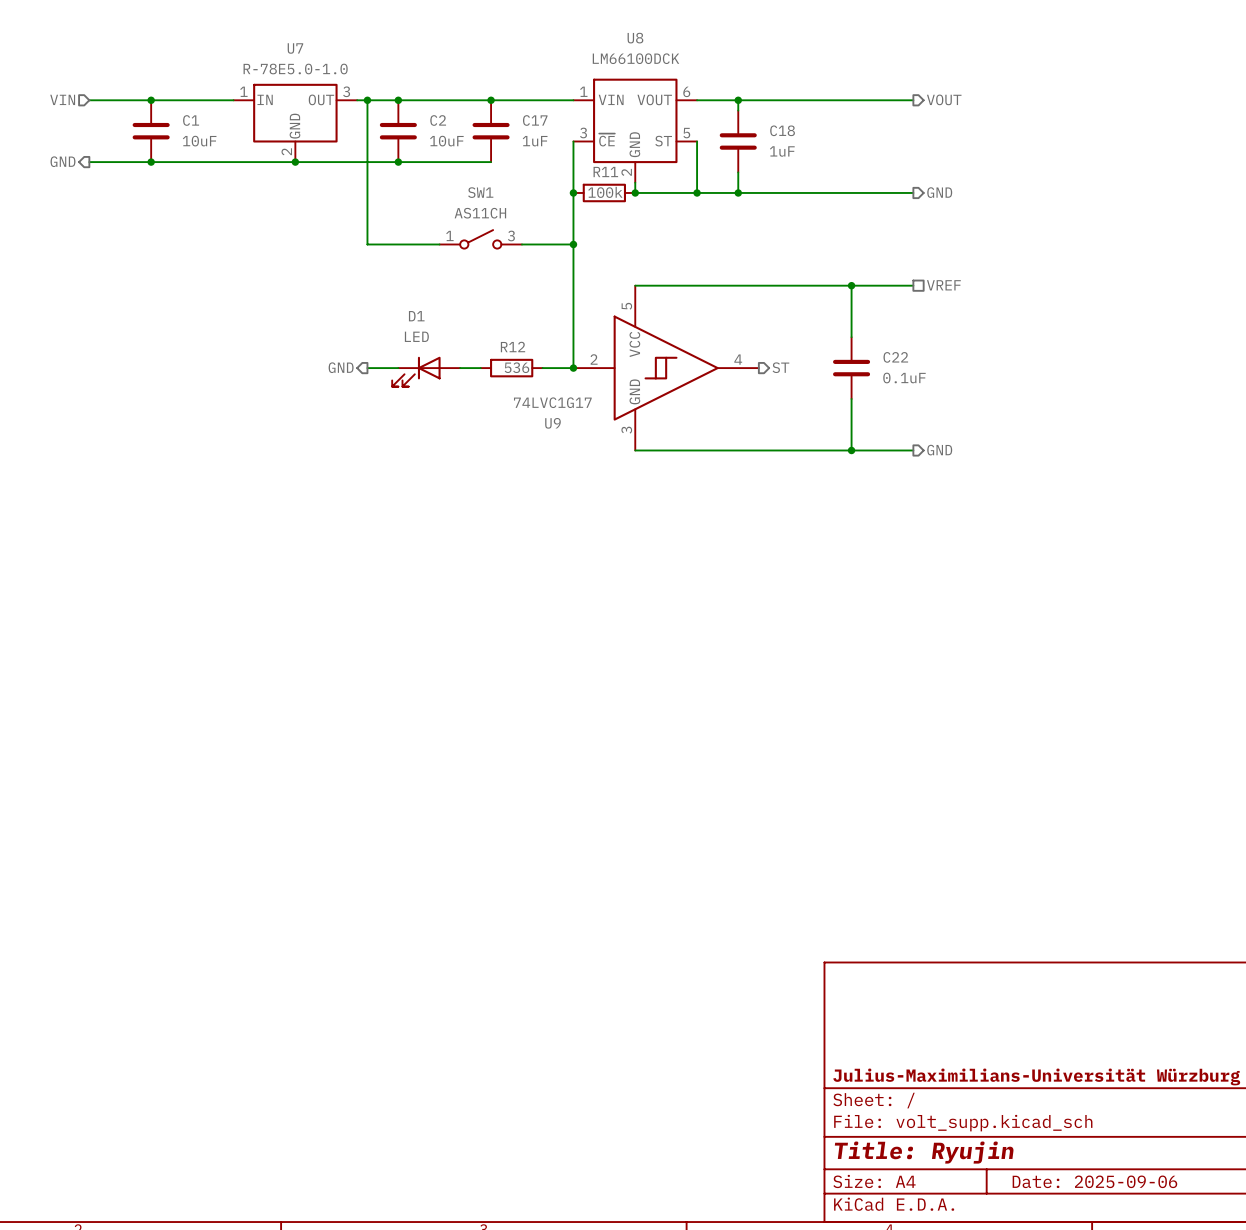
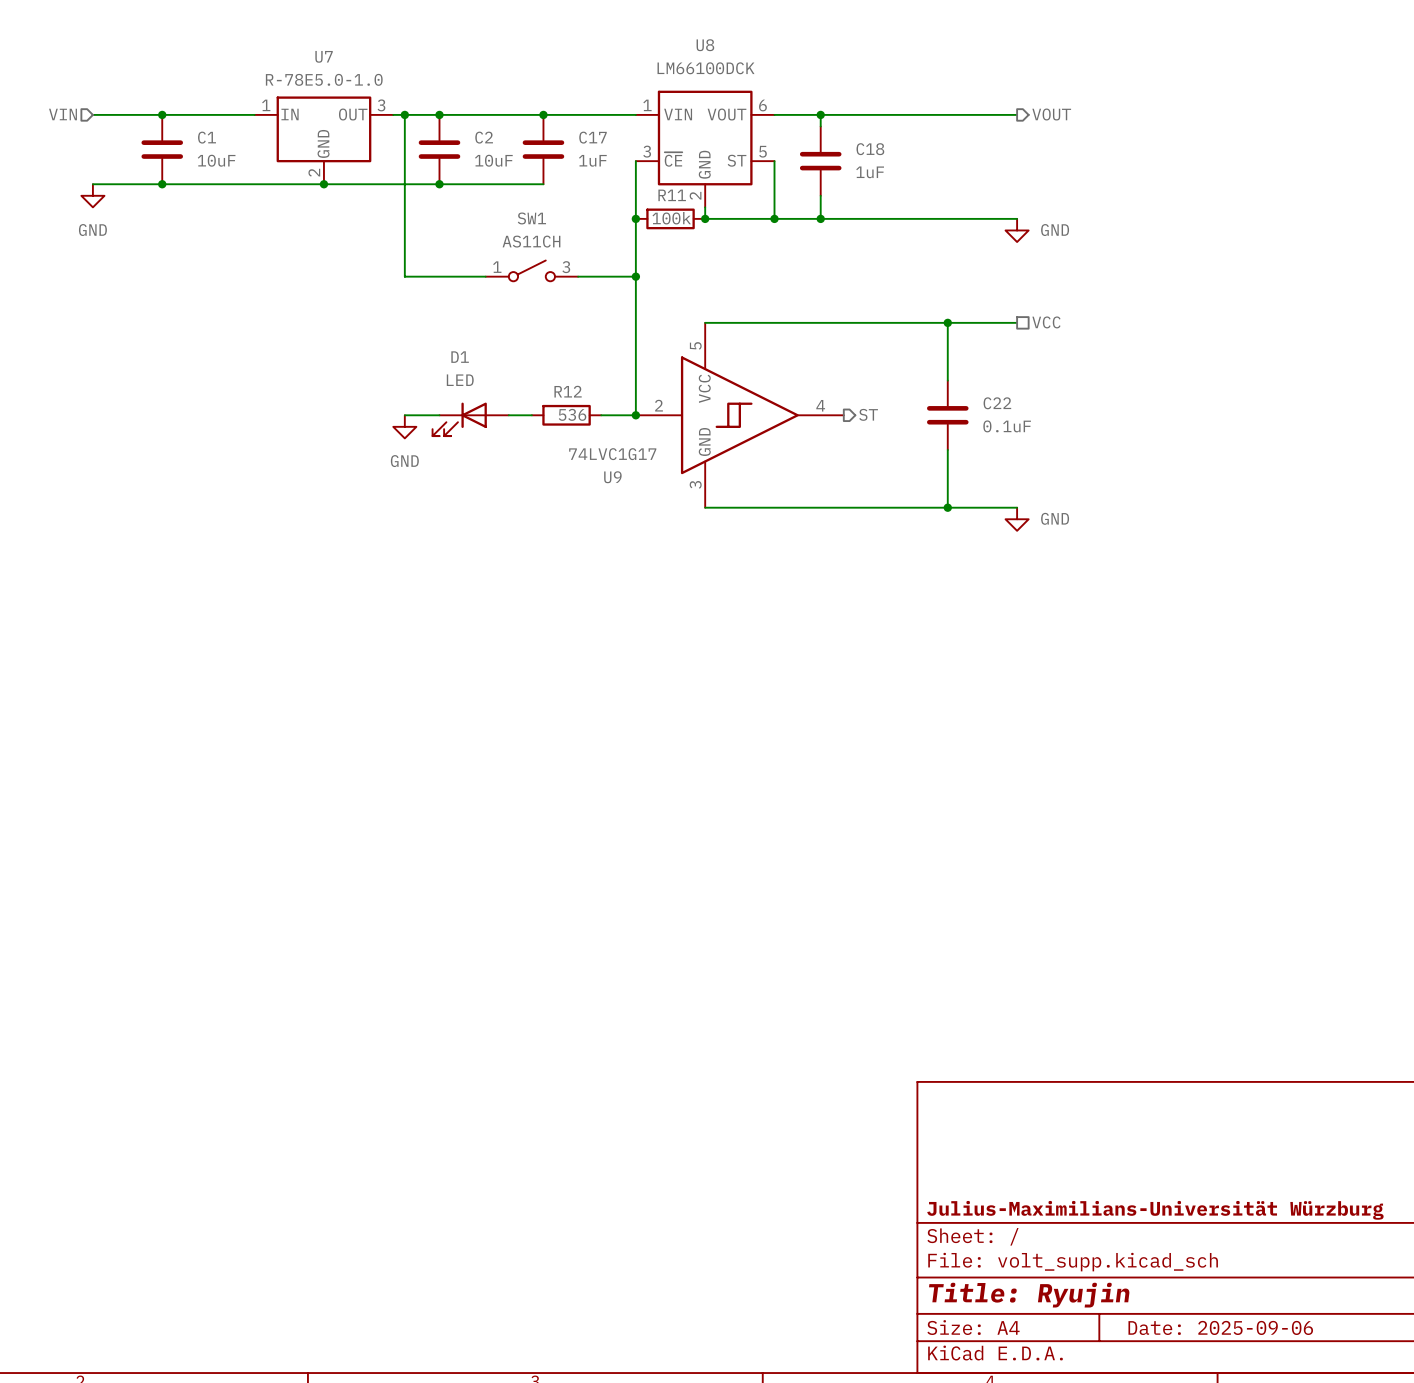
hierarchical label: GND (63, 161) -> none
power symbol: none -> GND (92, 195)
hierarchical label: GND (939, 192) -> none
power symbol: none -> GND (1017, 230)
hierarchical label: VREF (943, 285) -> VCC (1046, 322)
hierarchical label: GND (341, 367) -> none
power symbol: none -> GND (404, 426)
hierarchical label: GND (939, 450) -> none
power symbol: none -> GND (1017, 519)

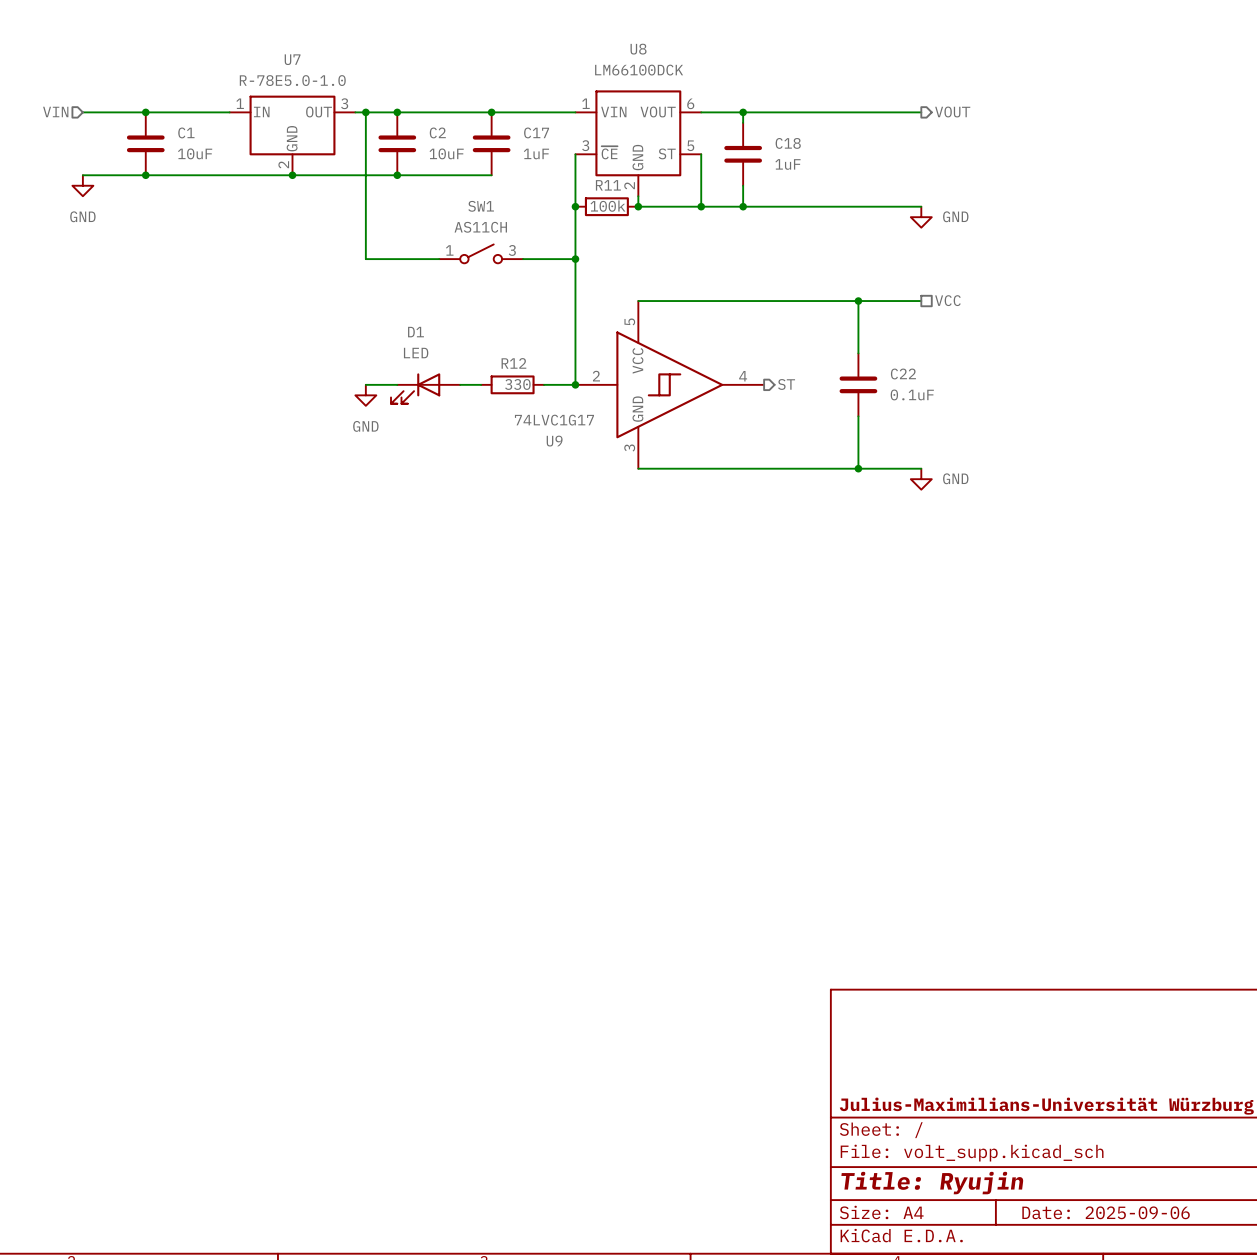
R12 value: 536 (572, 414) -> 330 (517, 384)

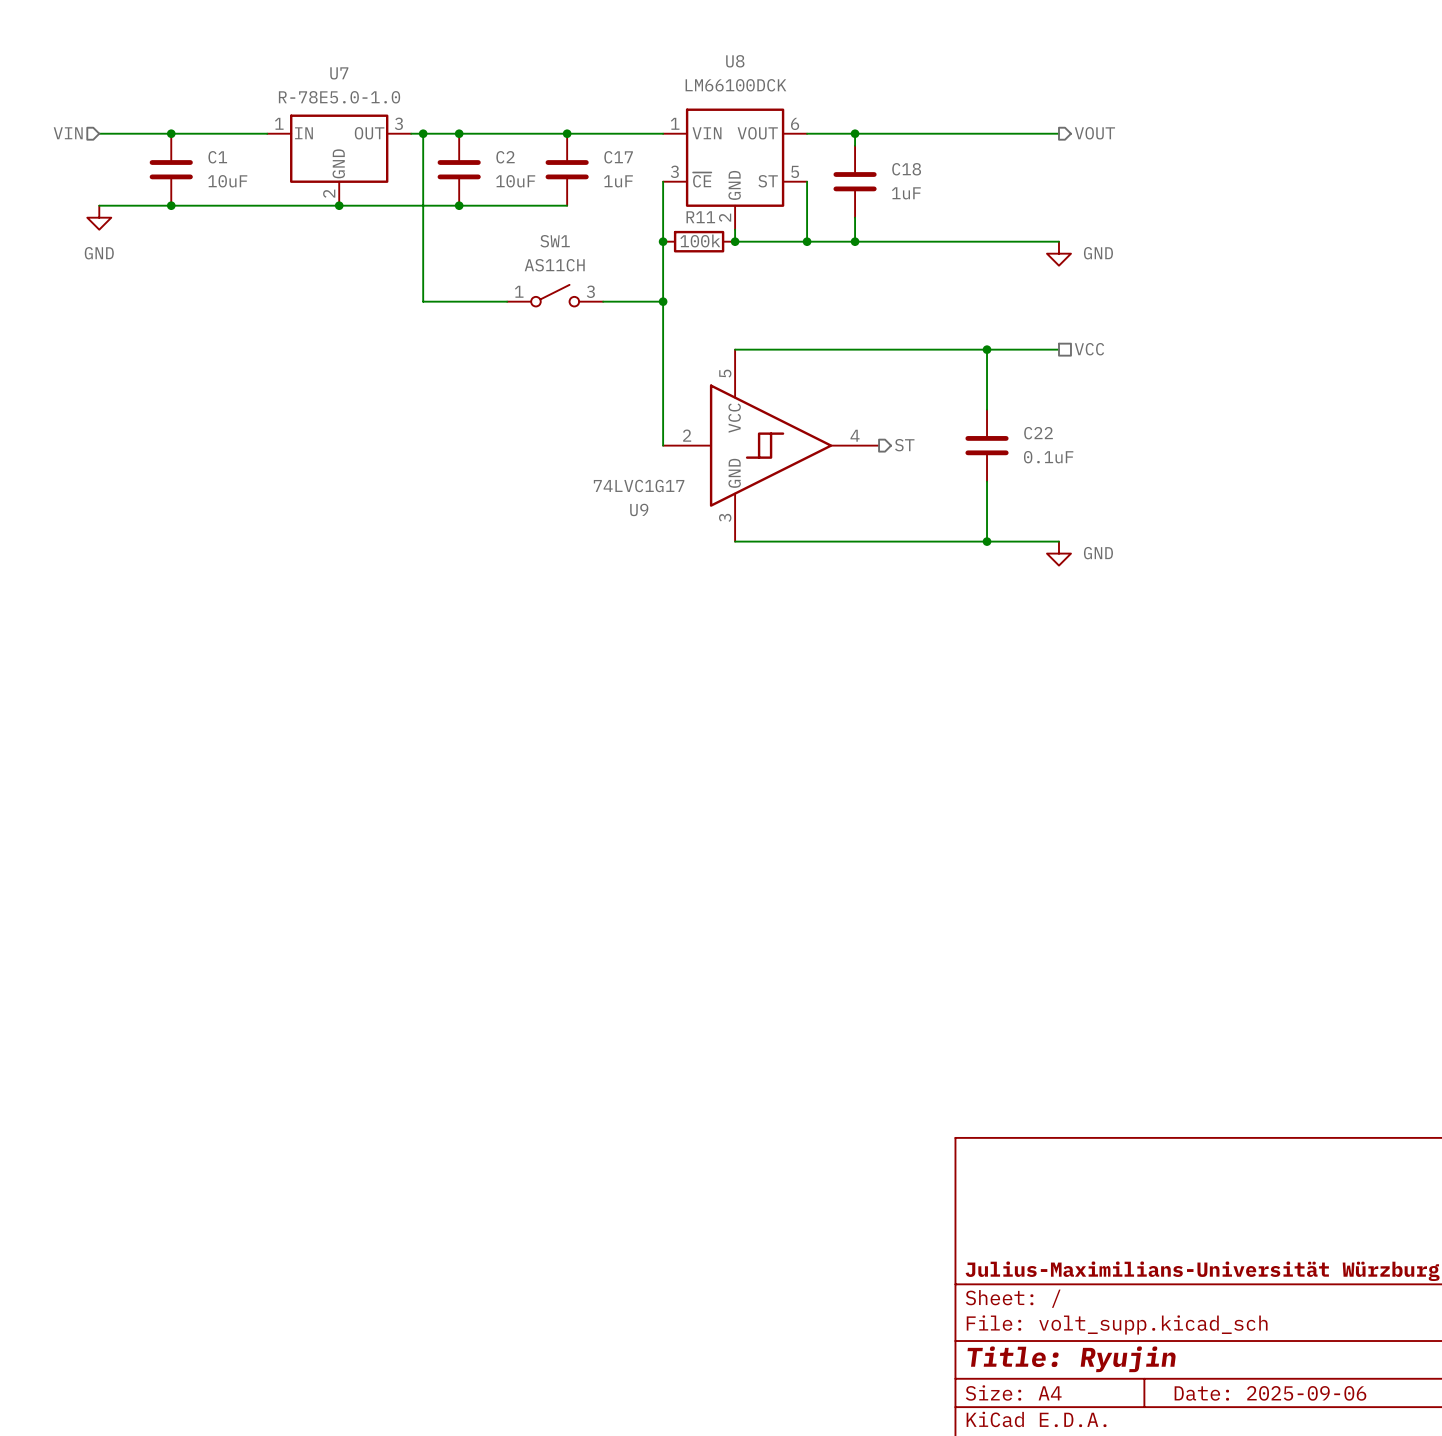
wire: (365, 384) (397, 384) -> none
wire: (460, 384) (481, 384) -> none
R12: 330 (512, 384) -> none
wire: (544, 384) (575, 384) -> none
junction: (575, 384) -> none
D1: LED (425, 388) -> none
power symbol: GND (365, 395) -> none

